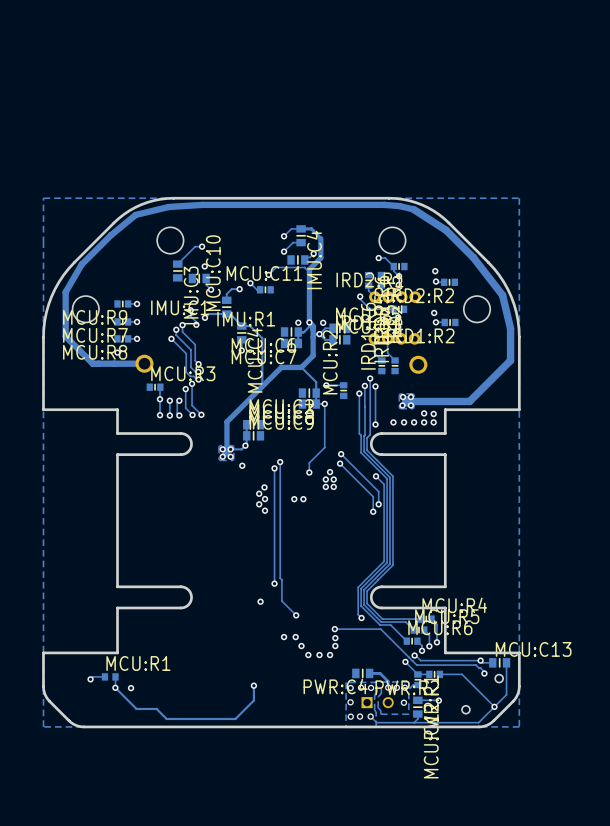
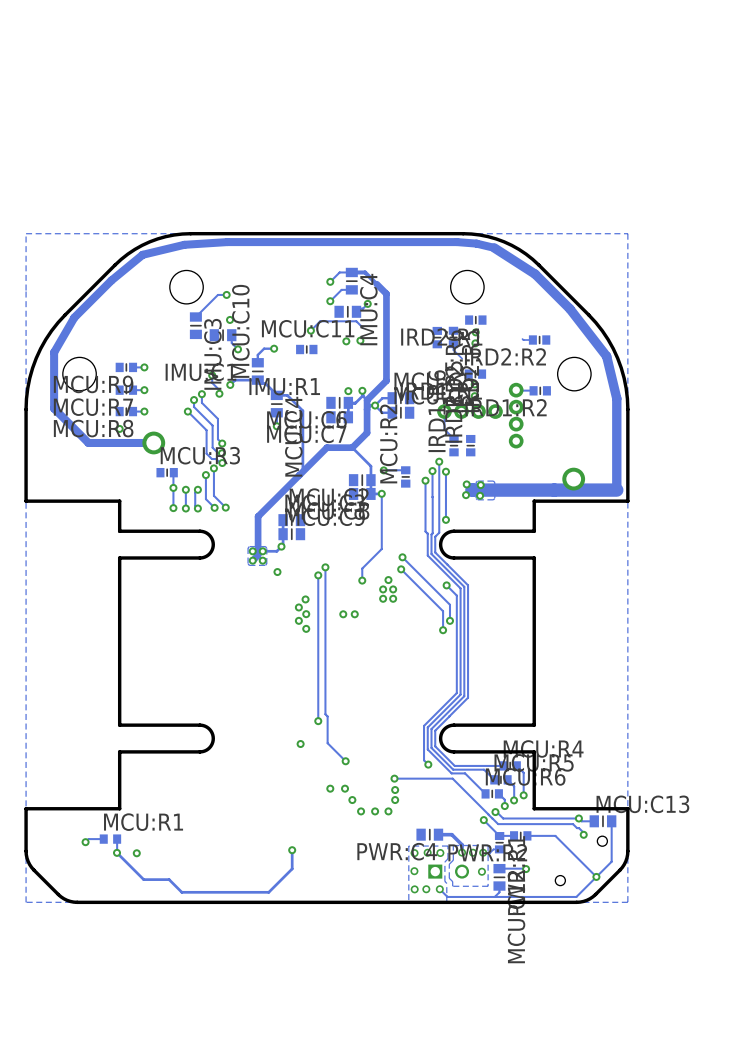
track: (320, 238) (320, 258) (309, 269) (309, 322) (313, 326) (313, 329) -> (376, 284) (386, 293) (386, 380) (367, 400)
track: (378, 258) (385, 258) (393, 266) (393, 271) (399, 276) -> none
via: (378, 258) -> none
via: (435, 271) -> none
via: (436, 281) -> none
via: none -> (360, 340)
track: (250, 283) (256, 289) (260, 289) -> none
via: (250, 283) -> none
via: none -> (346, 341)
track: (368, 285) (368, 290) (374, 297) -> none
track: (360, 296) (360, 299) (370, 309) (393, 309) (393, 312) (398, 317) -> none
via: (360, 296) -> none
part rotation: 0° (395, 297) -> 90° clockwise (516, 415)
part position: (395, 297) -> (516, 415)
via: (434, 312) -> none
via: (323, 322) -> none
via: (435, 322) -> none
track: (387, 338) (387, 353) (395, 360) -> none
track: (510, 360) (469, 401) (407, 401) -> (616, 438) (616, 490) (472, 489)
part position: (418, 364) -> (573, 479)
via: none -> (466, 484)
via: (410, 397) -> none
via: none -> (466, 495)
via: (410, 405) -> none
via: (424, 413) -> none
via: (433, 413) -> none
via: (393, 422) -> none
via: (404, 422) -> none
via: (414, 422) -> none
via: (424, 422) -> none
via: (433, 422) -> none

